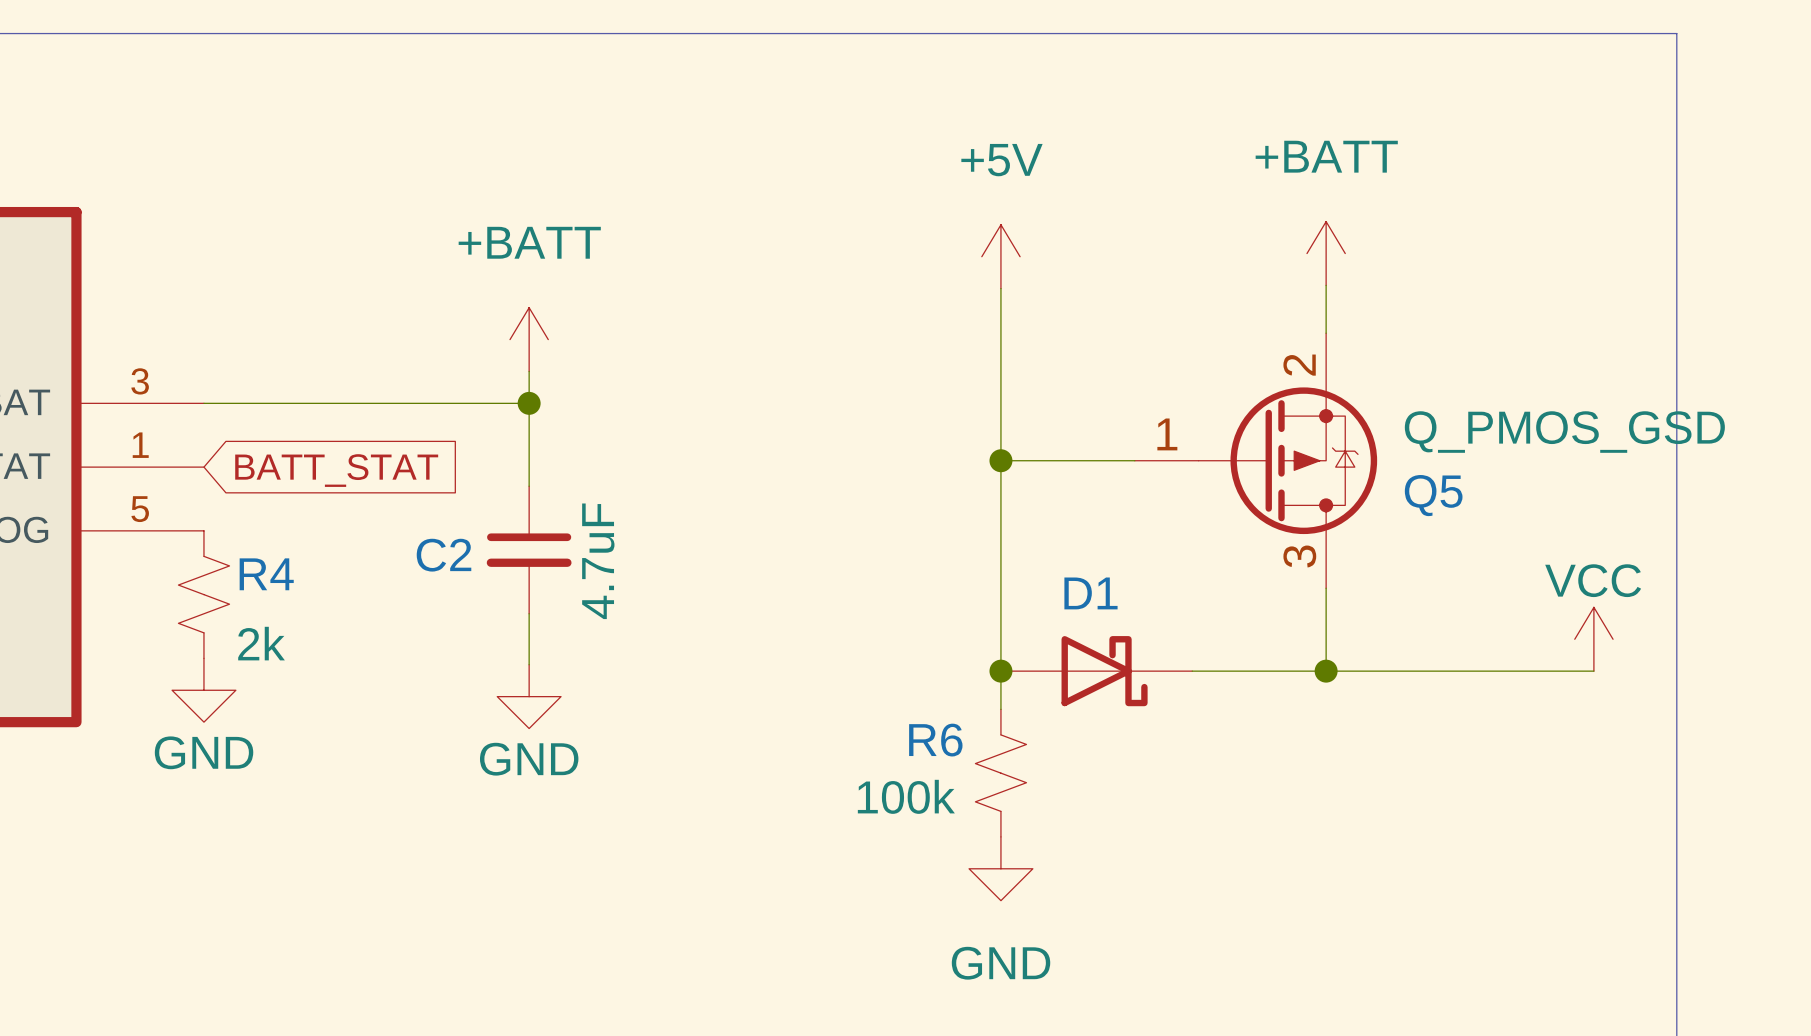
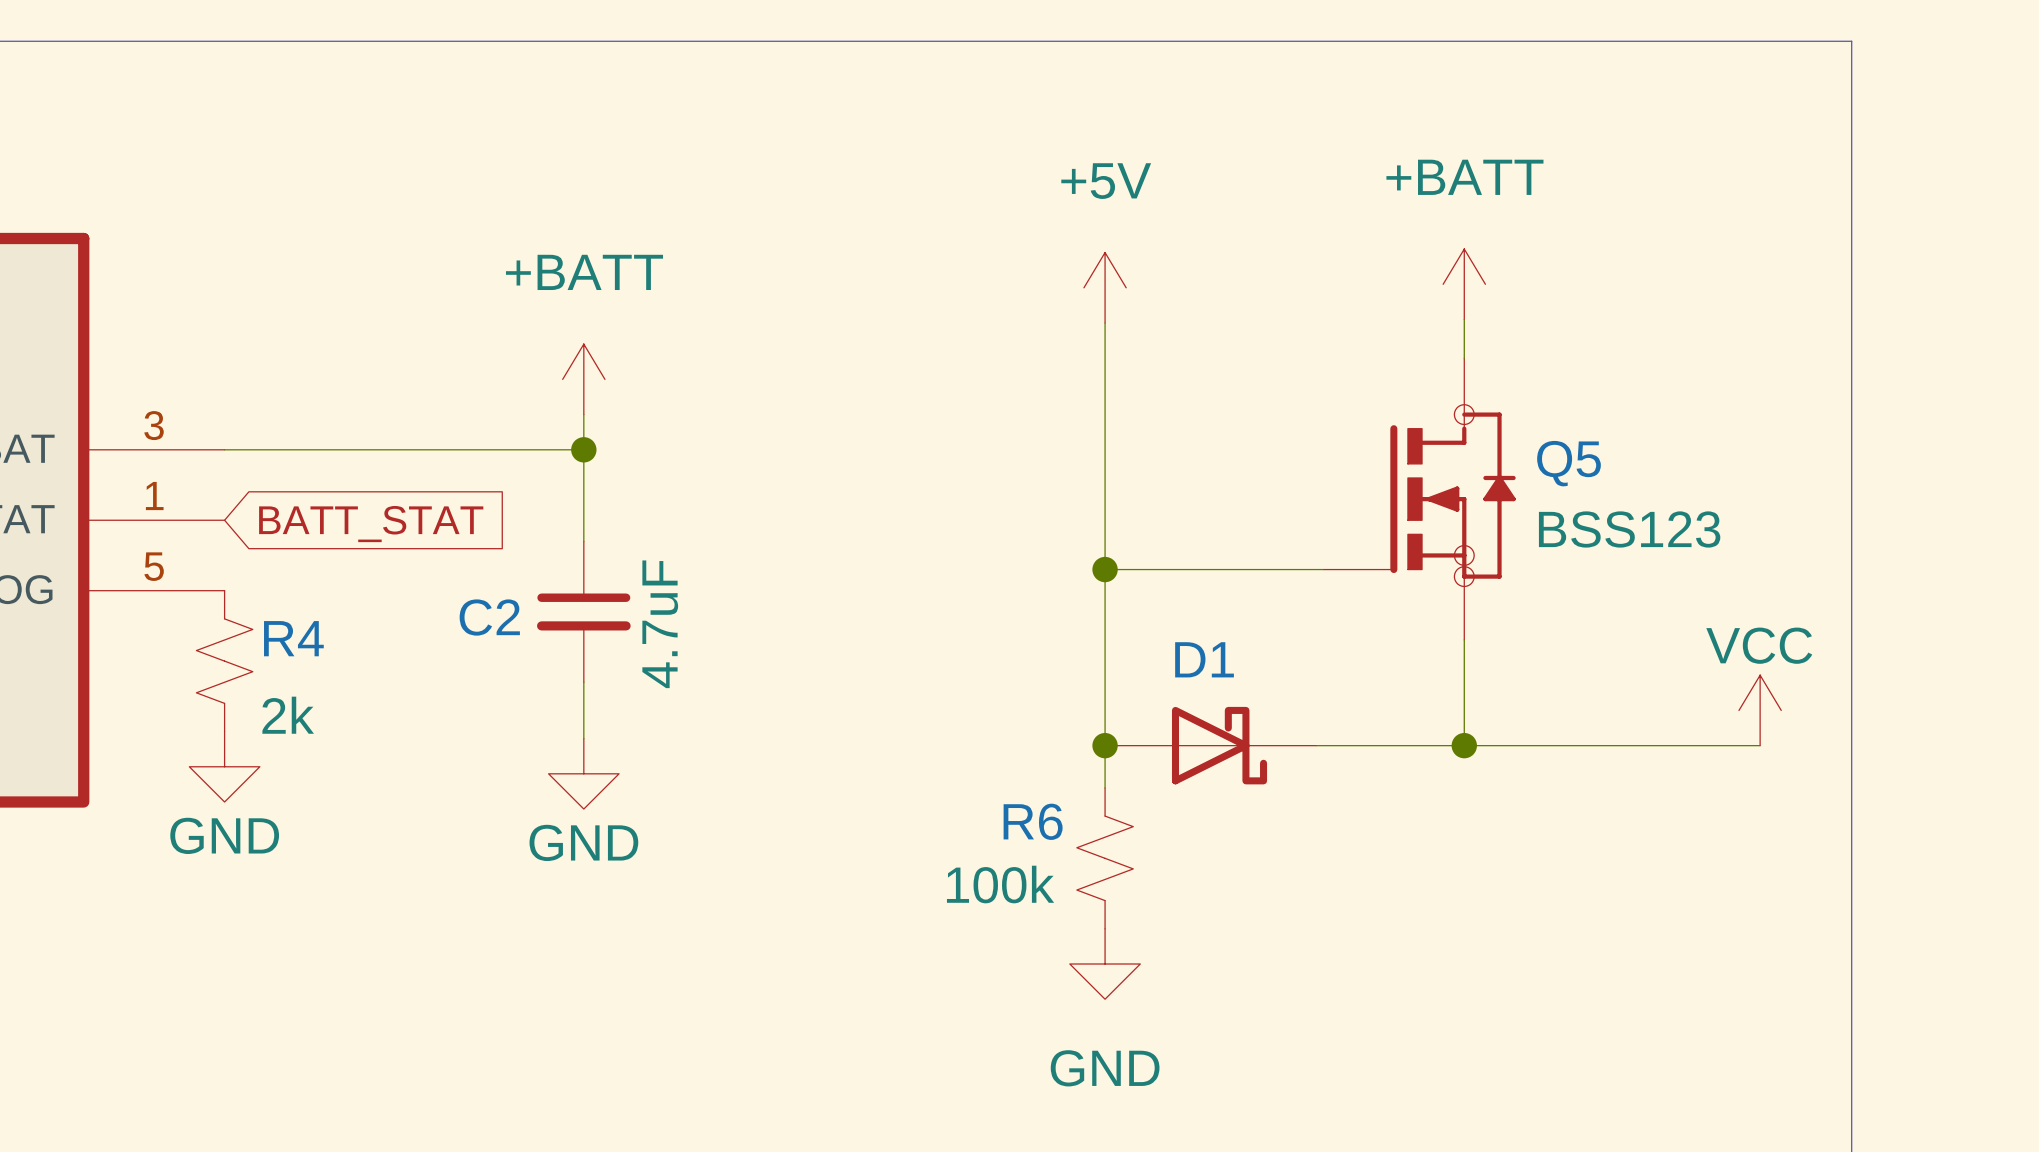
Q5 symbol: [1134, 333, 1378, 589] -> [1323, 358, 1516, 640]
Q5 value: Q_PMOS_GSD (1564, 432) -> BSS123 (1629, 529)
wire: (1000, 460) (1134, 460) -> none
junction position: (1000, 460) -> (1105, 569)
Q5 name position: Q5 (1433, 495) -> Q5 (1569, 463)
wire: none -> (1105, 569) (1323, 569)

